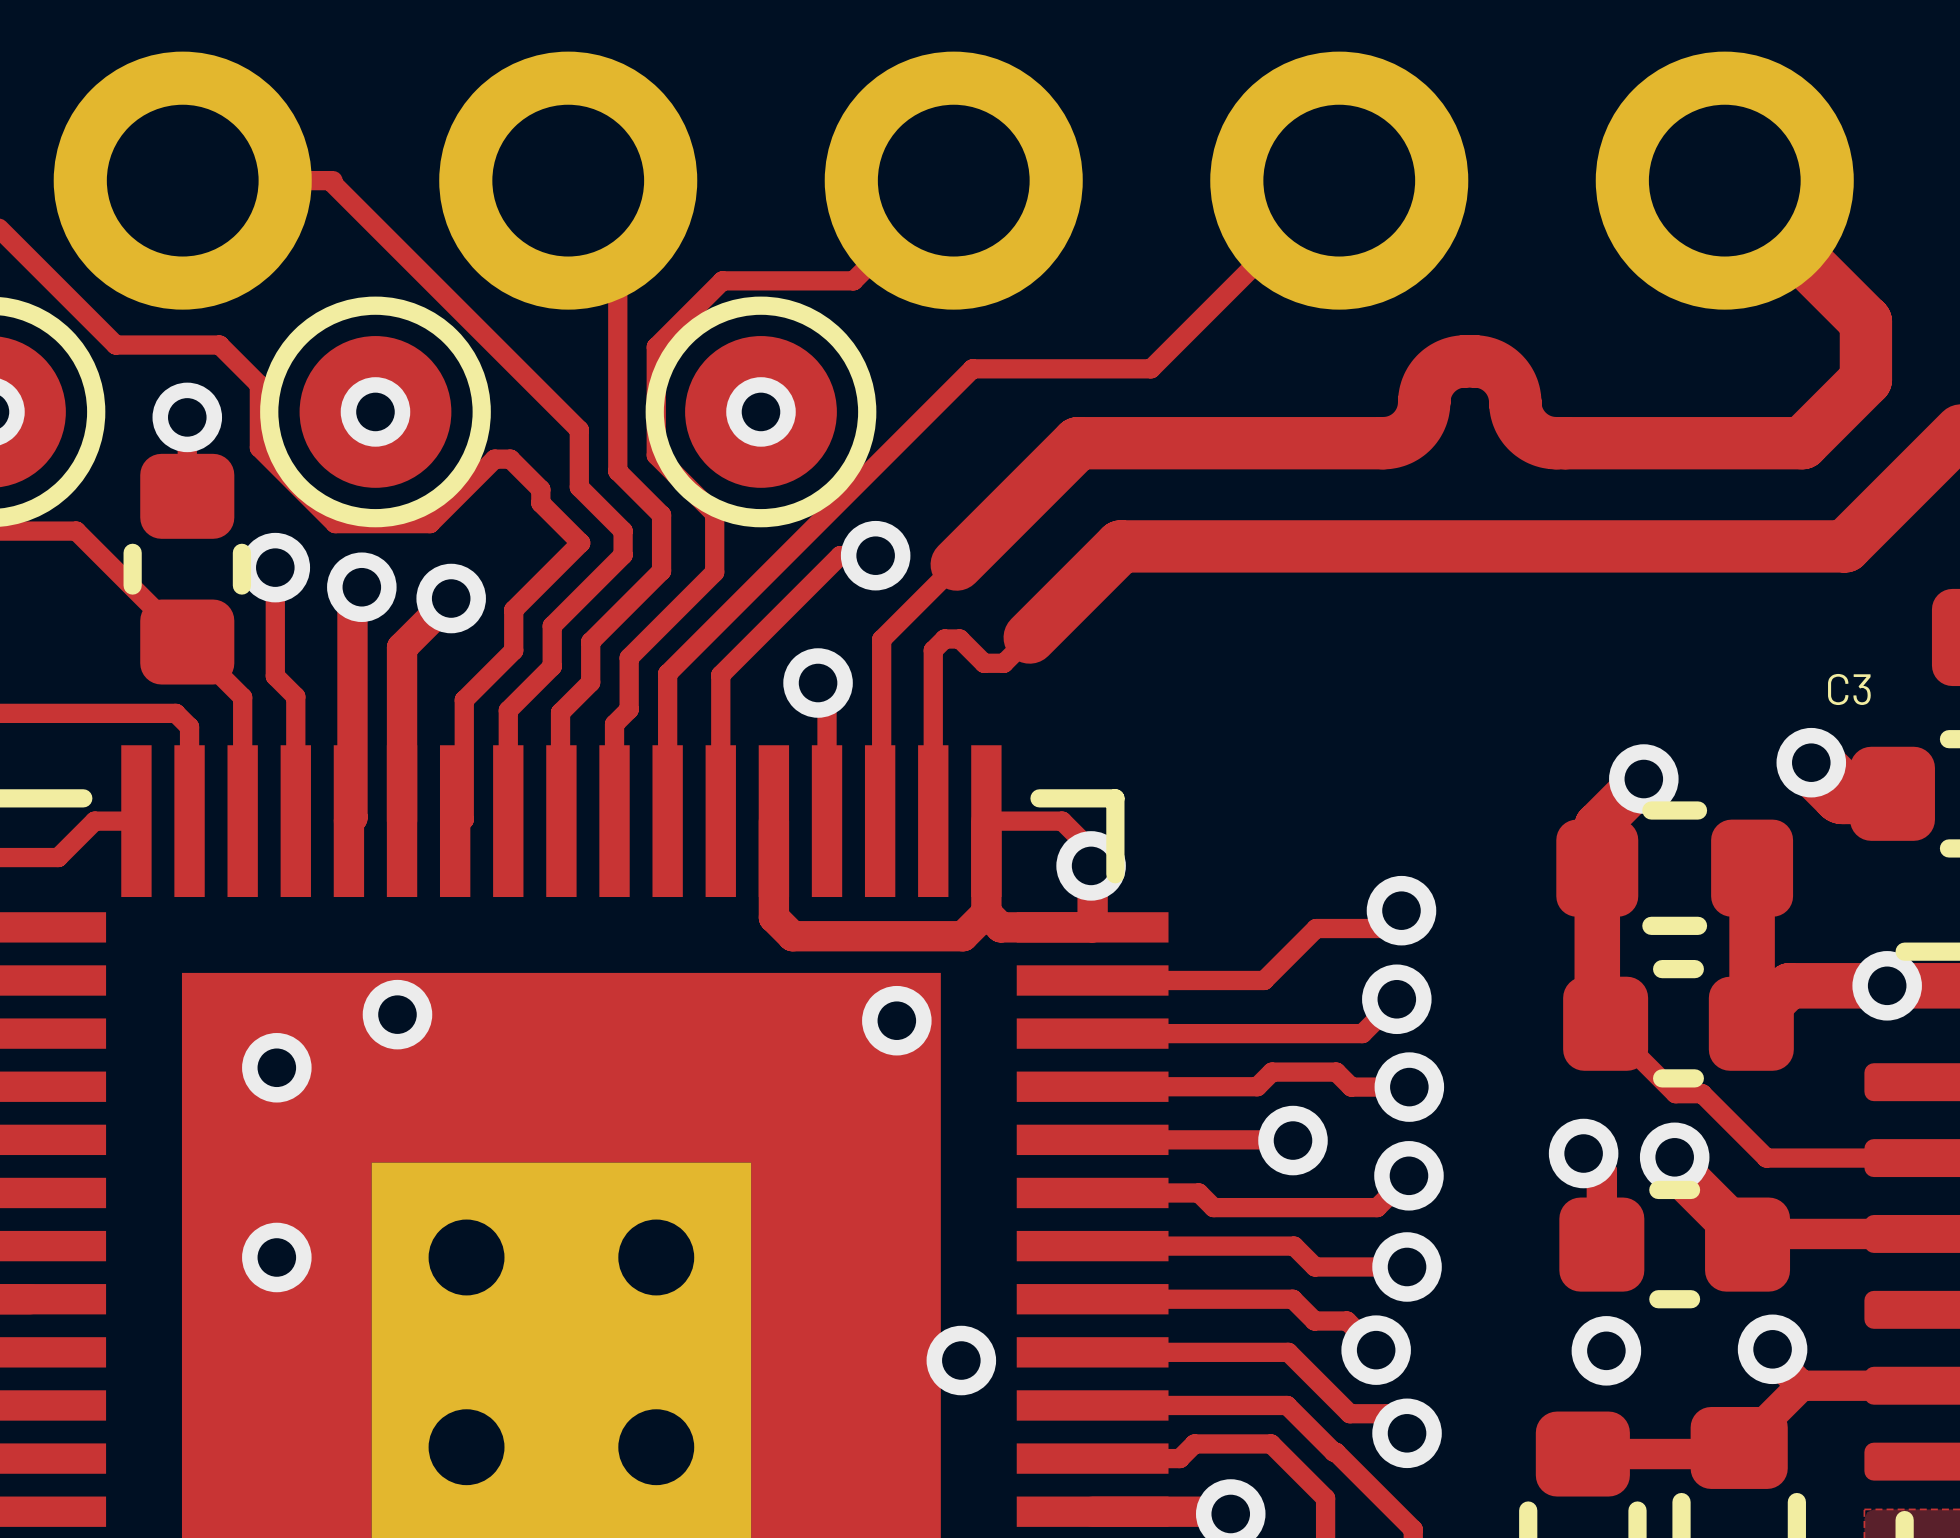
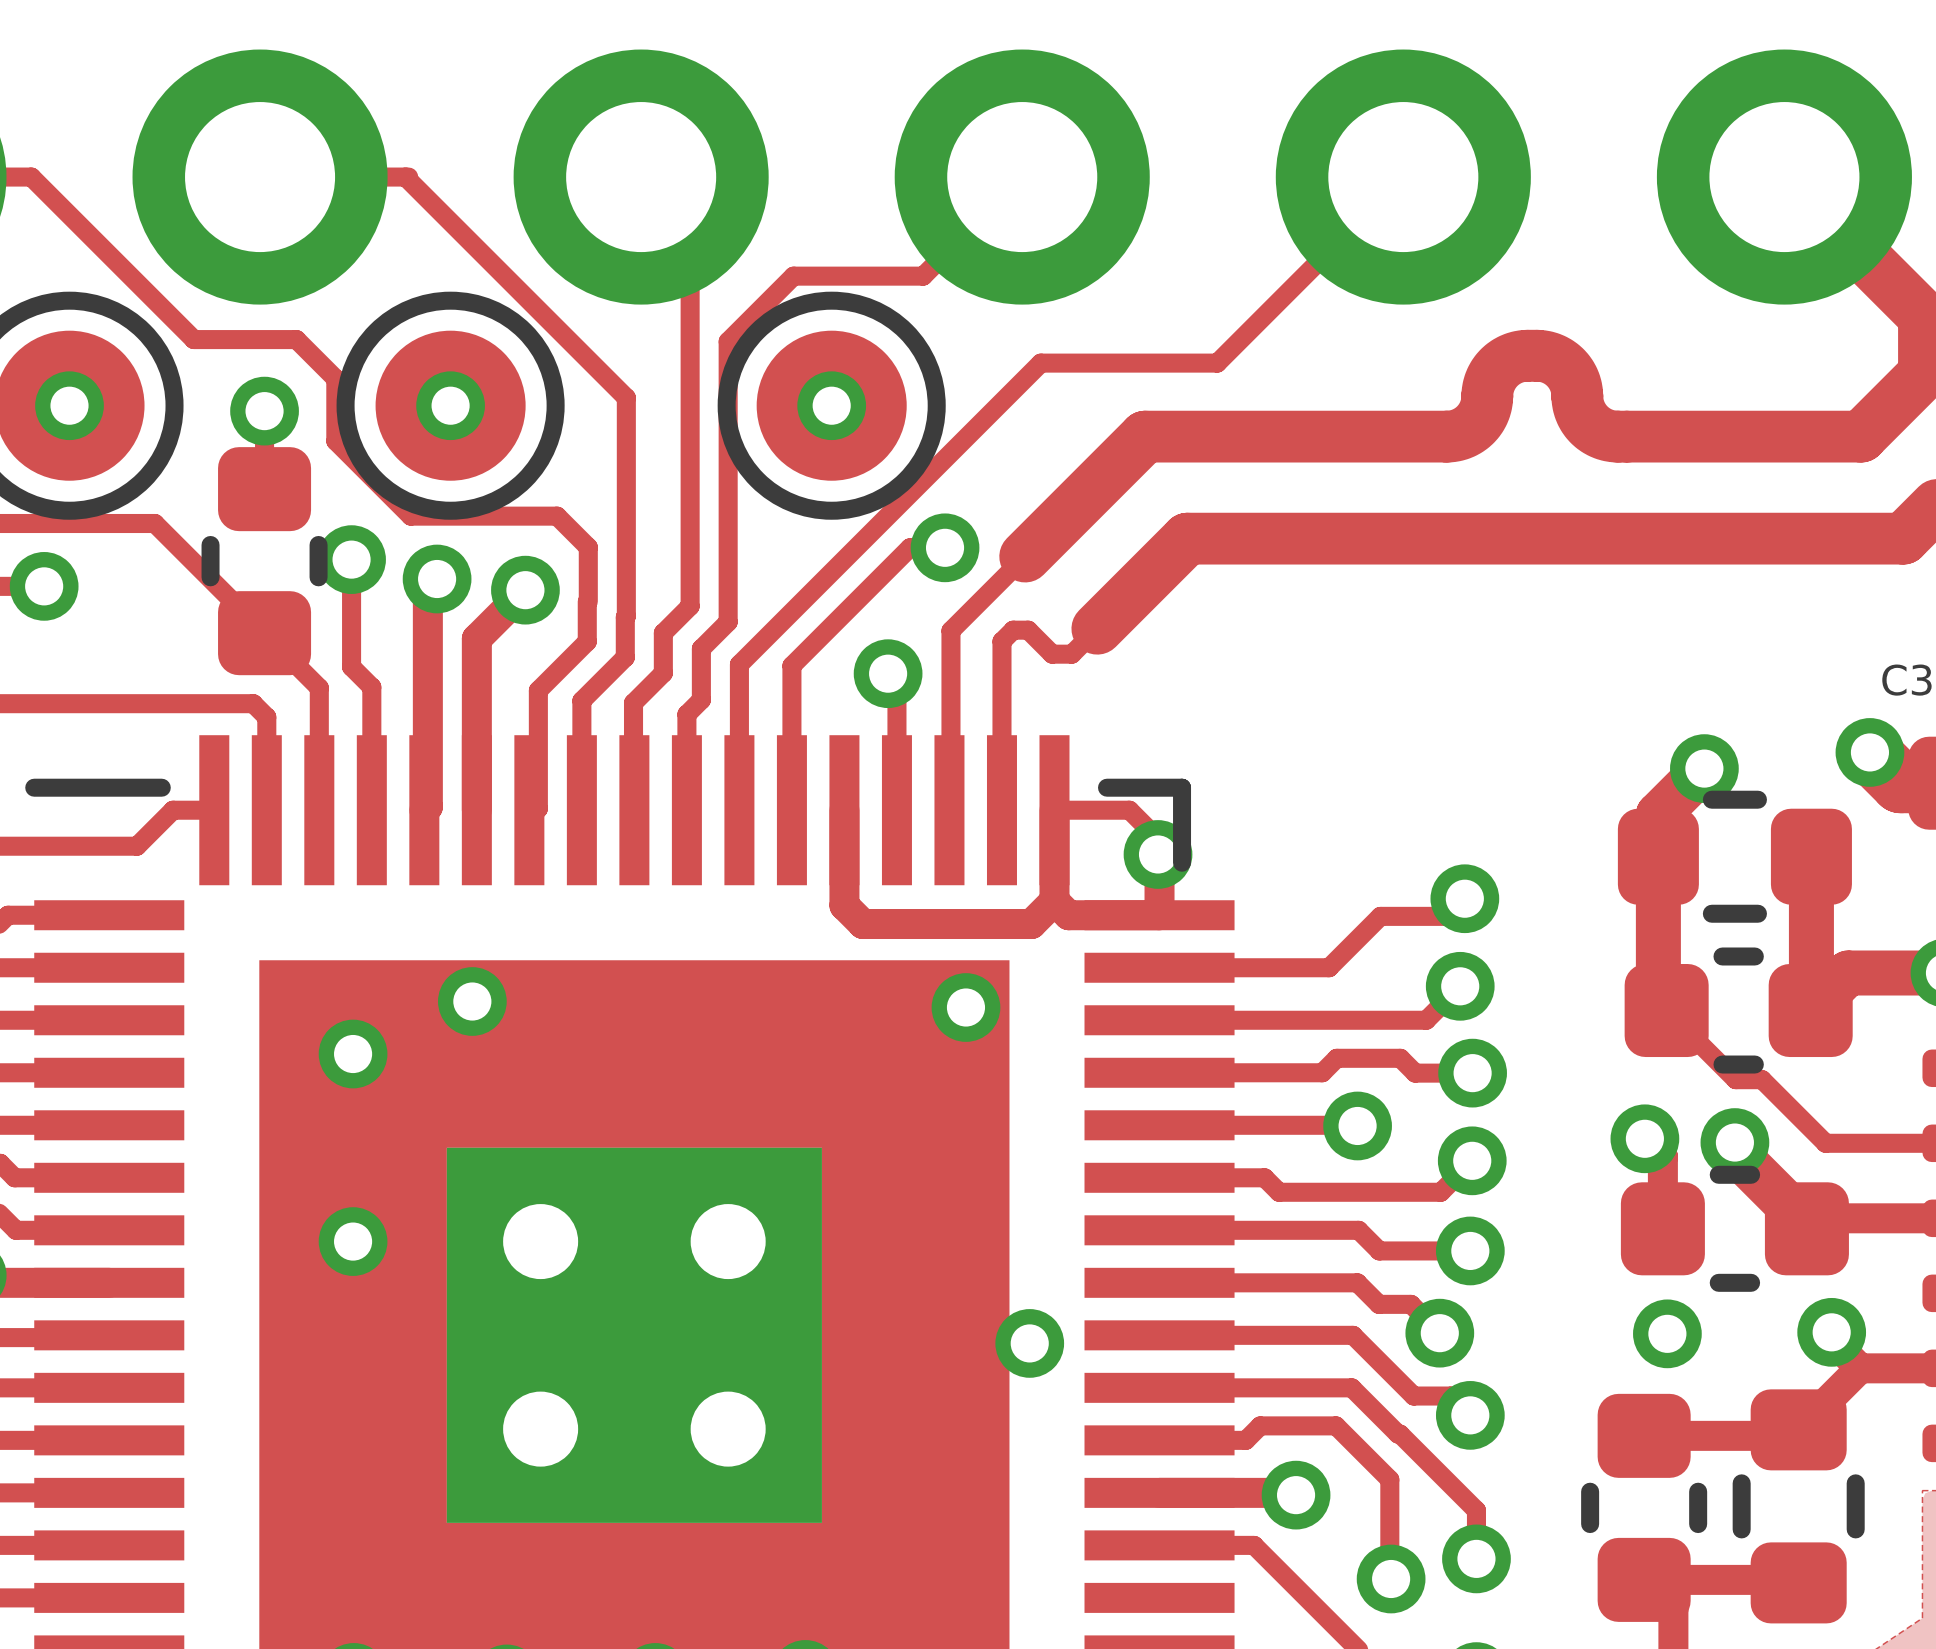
track: (553, 403) (579, 429) (579, 487) (623, 530) (623, 555) (553, 624) -> (626, 397) (626, 616)
track: (656, 455) (714, 513) (714, 572) (656, 630) -> (728, 448) (728, 621)
track: (617, 471) (661, 515) (661, 570) (617, 614) -> (690, 464) (690, 606)
track: (430, 523) (494, 459) (510, 459) (540, 489) (540, 503) (580, 543) (513, 610) -> (504, 516) (557, 516) (588, 547) (588, 601)

